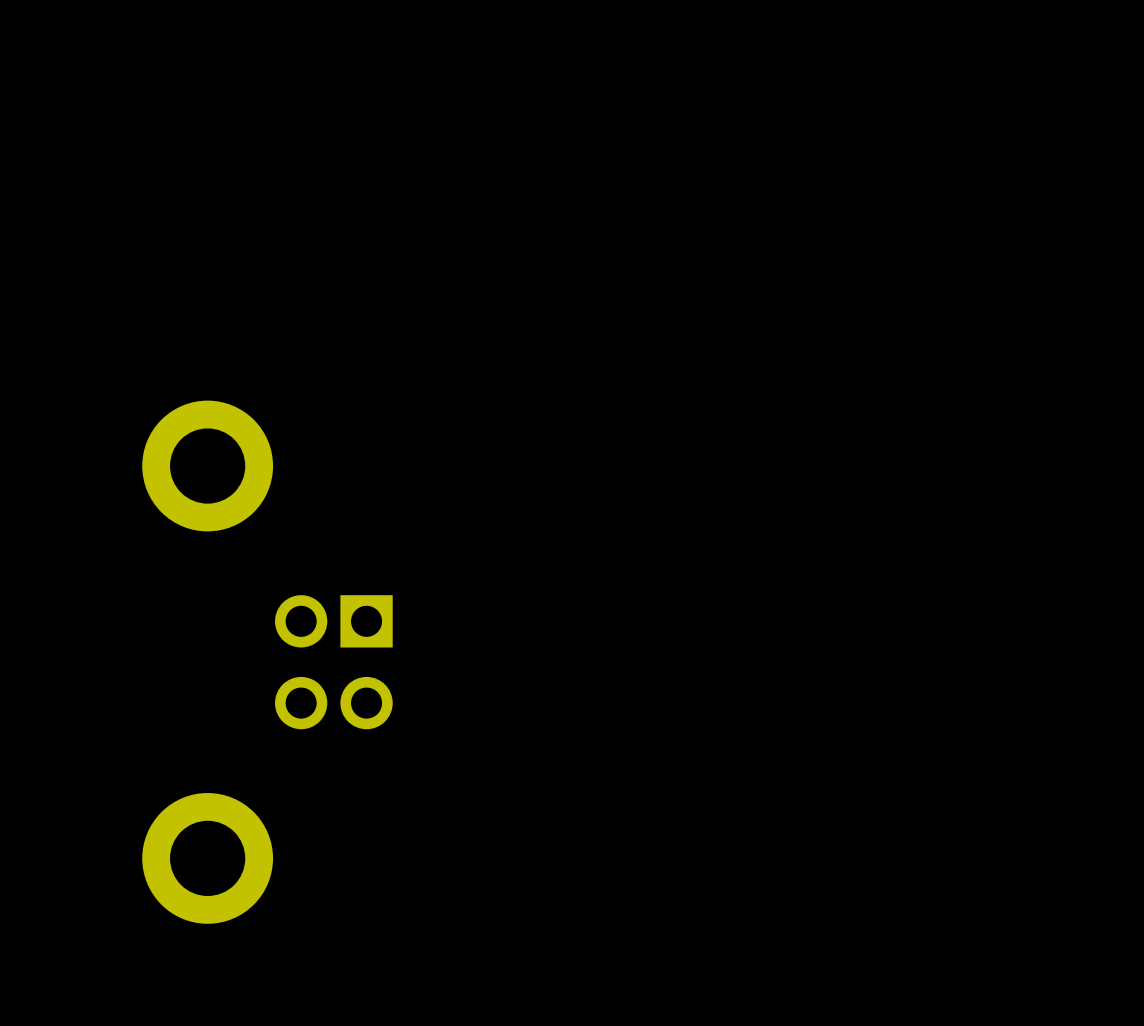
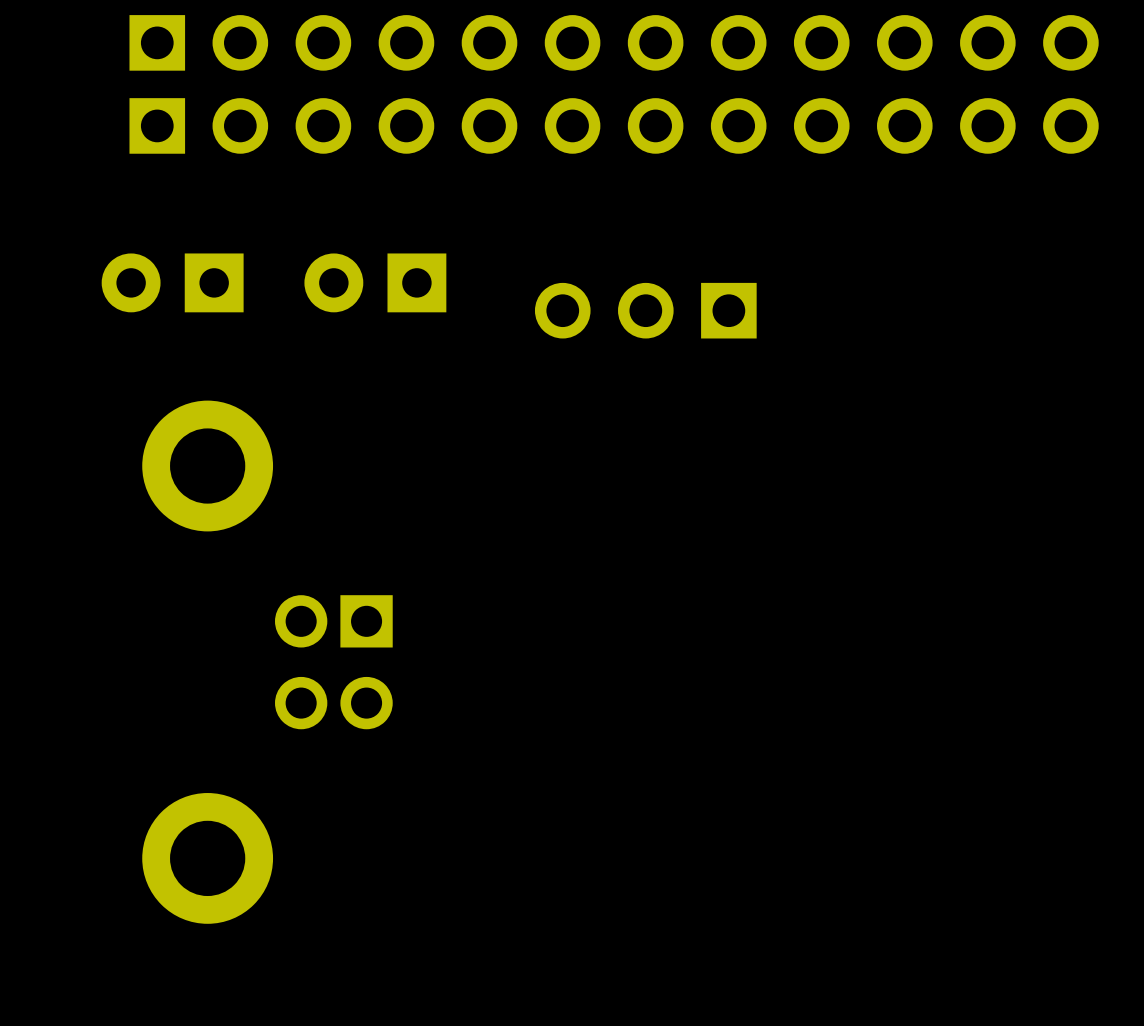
part: none -> (614, 42)
part: none -> (614, 125)
part: none -> (172, 282)
part: none -> (375, 282)
part: none -> (645, 310)

